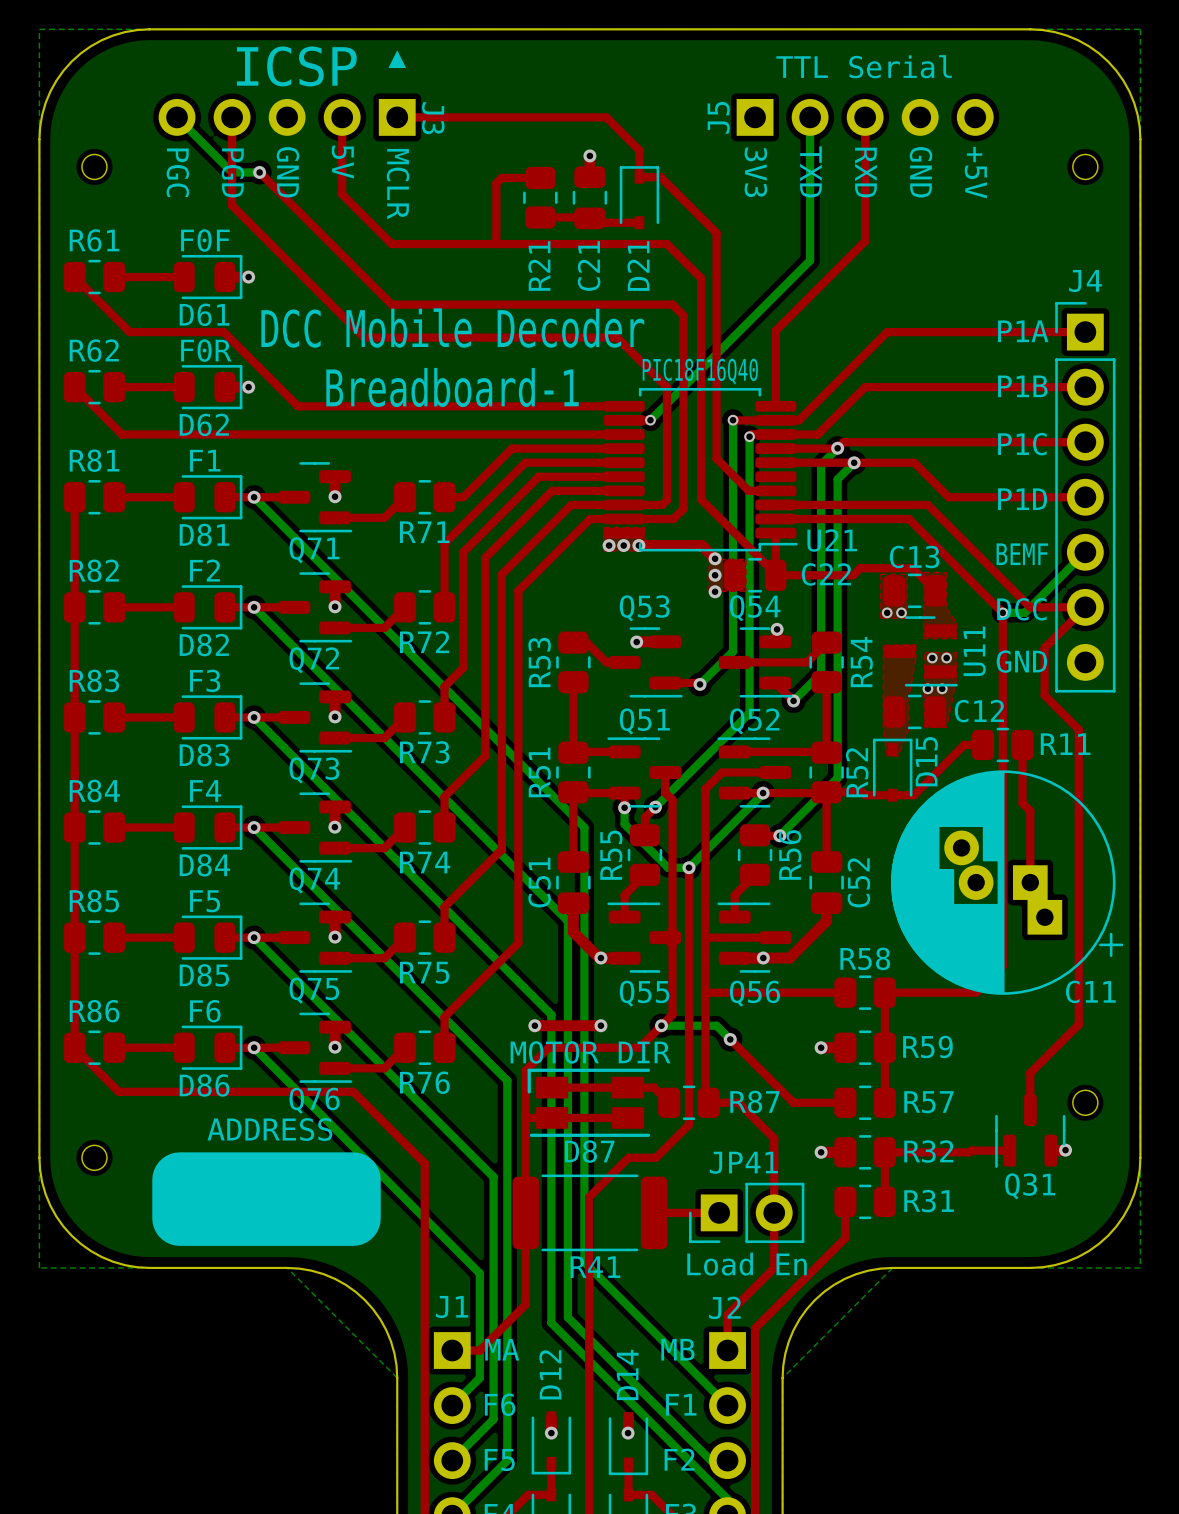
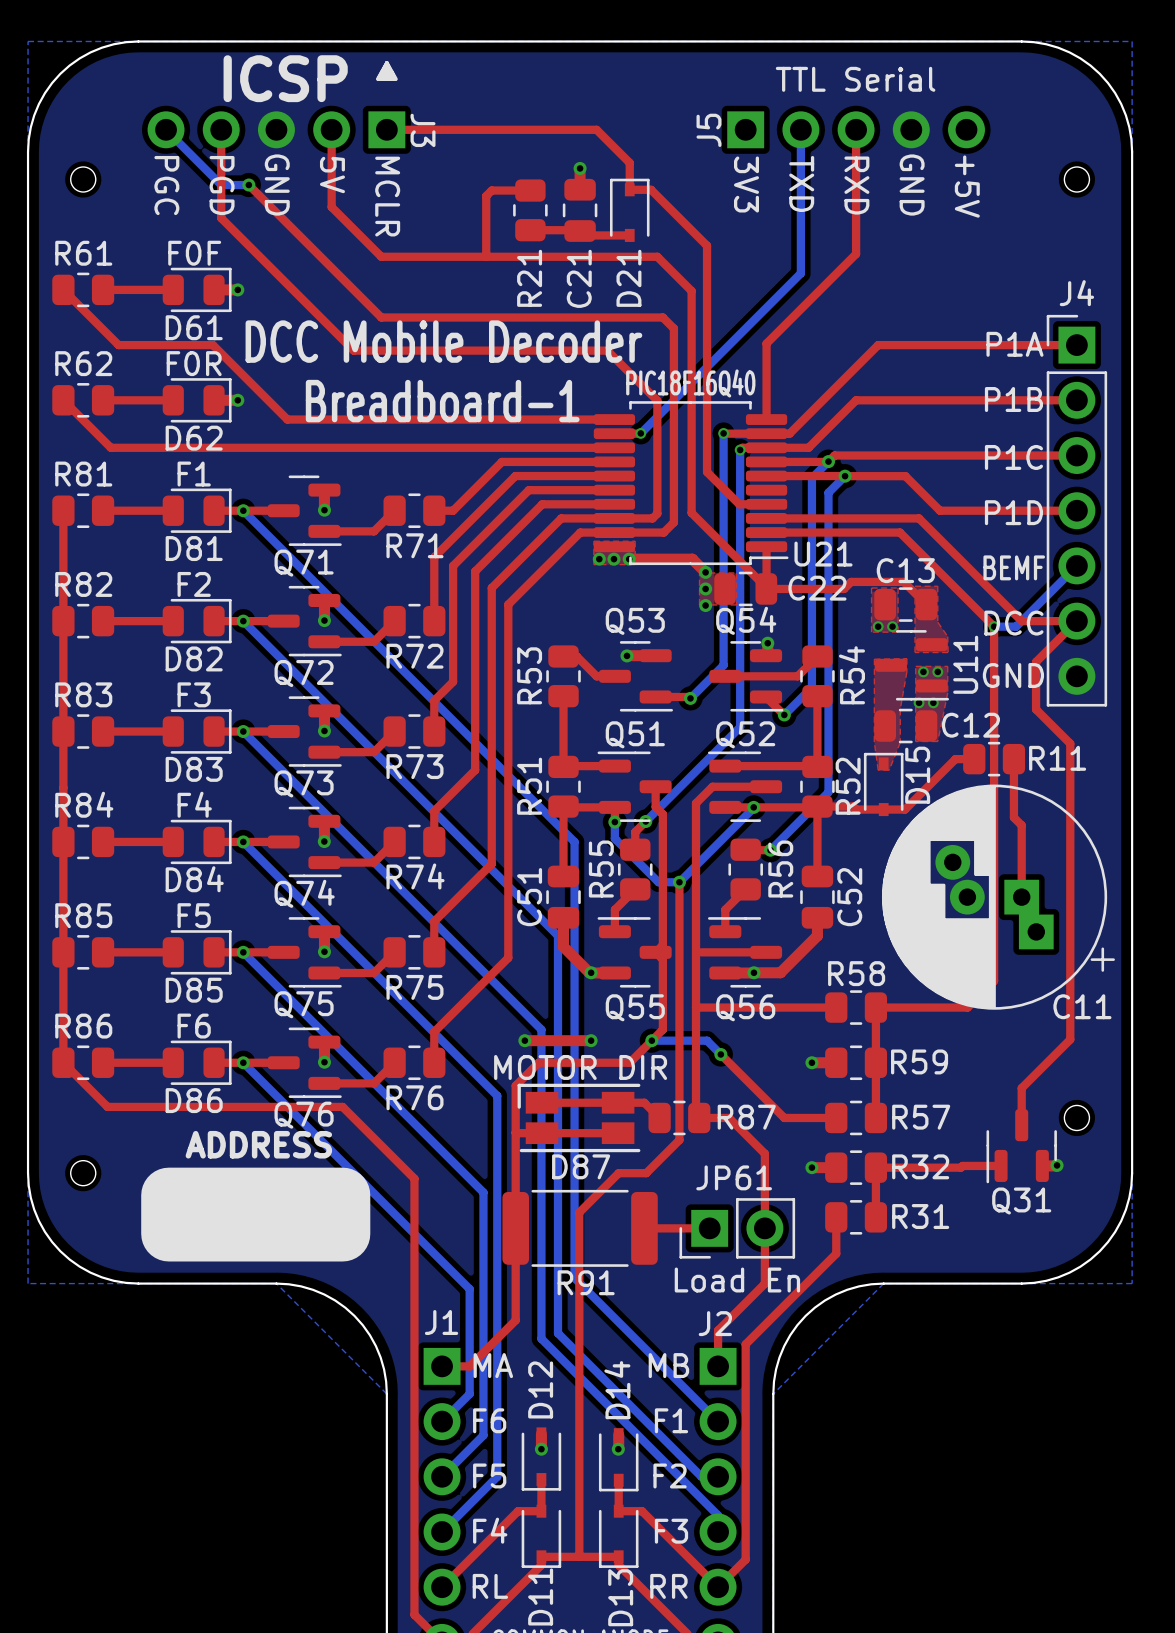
JP41 name: JP41 (743, 1162) -> JP61 (734, 1177)
R41 name: R41 (595, 1267) -> R91 (586, 1282)

